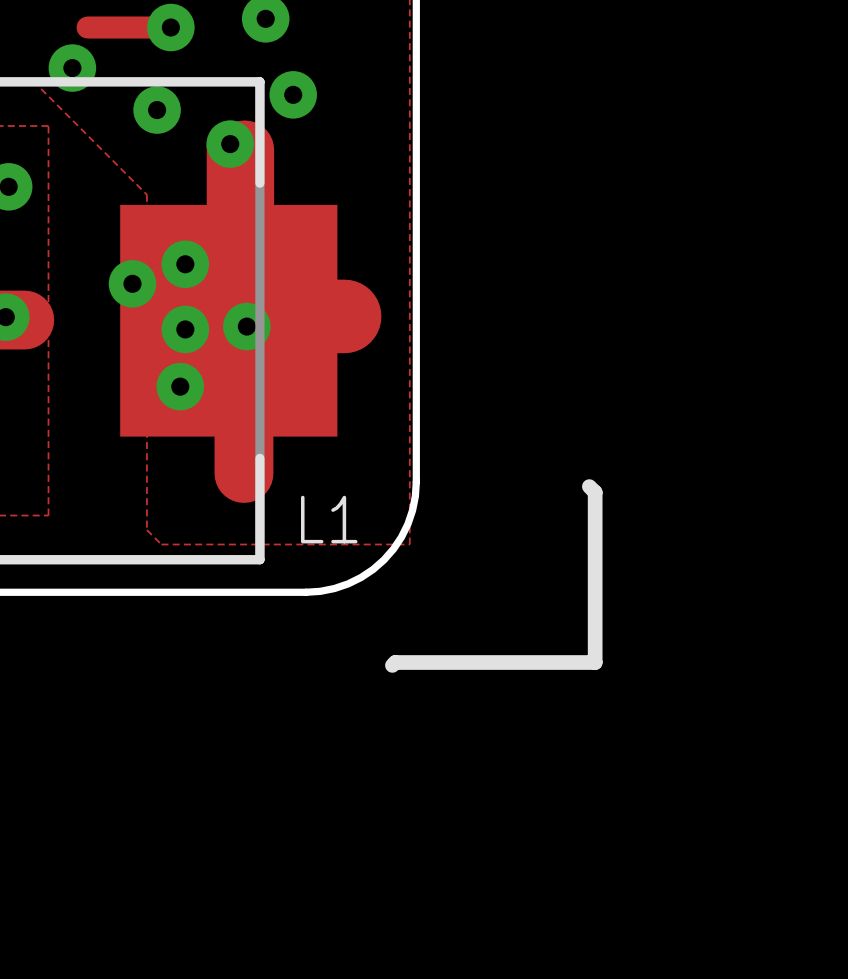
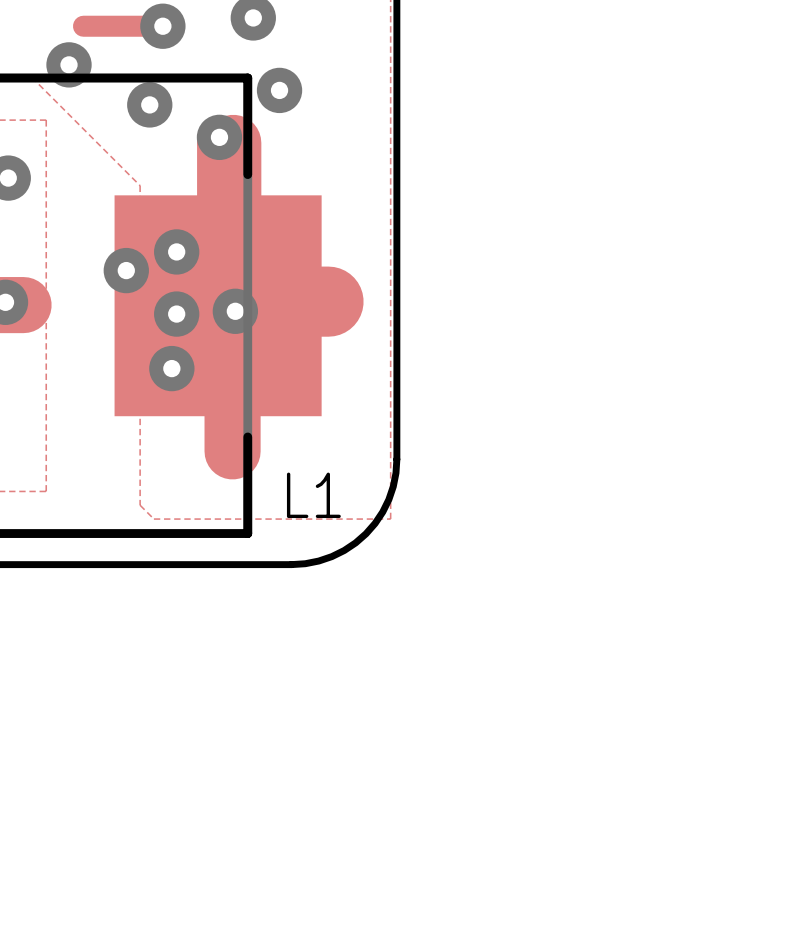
line: (589, 486) (595, 492) (595, 662) (395, 662) (392, 665) -> none

